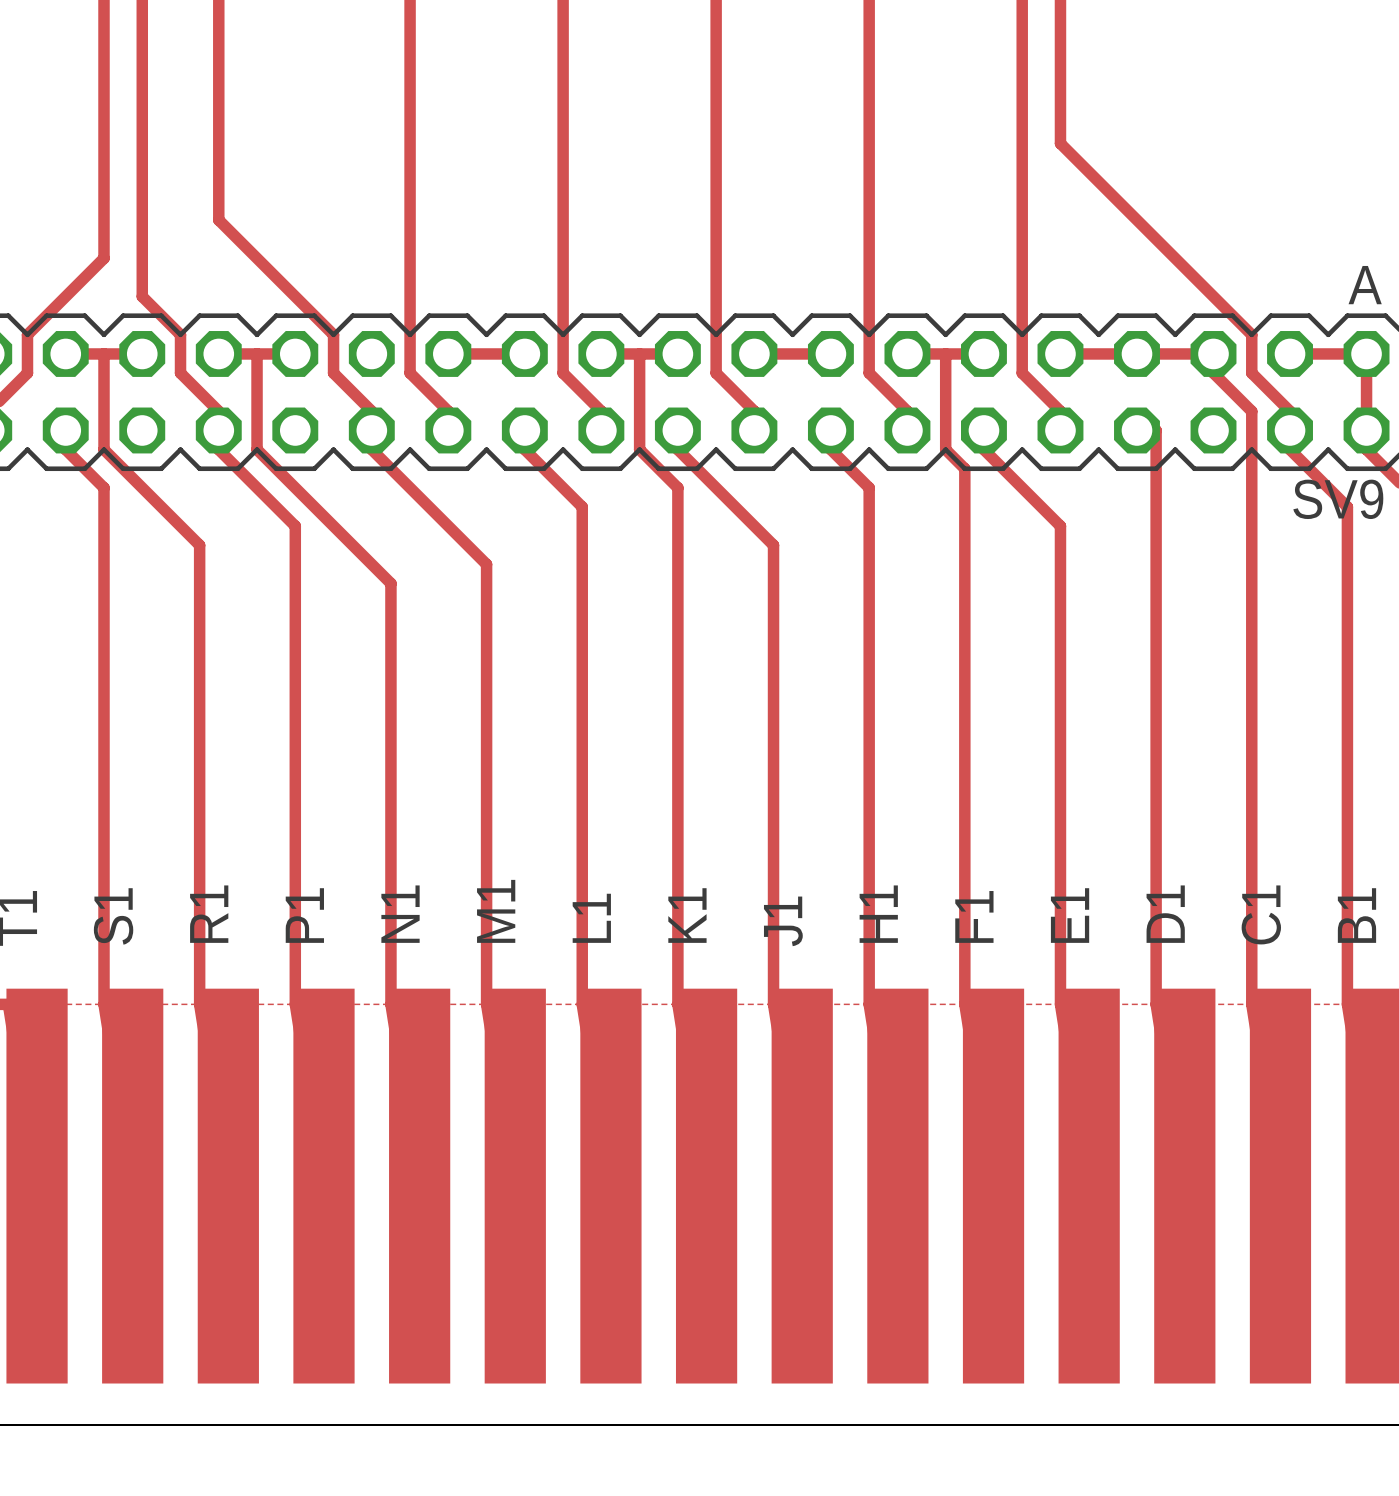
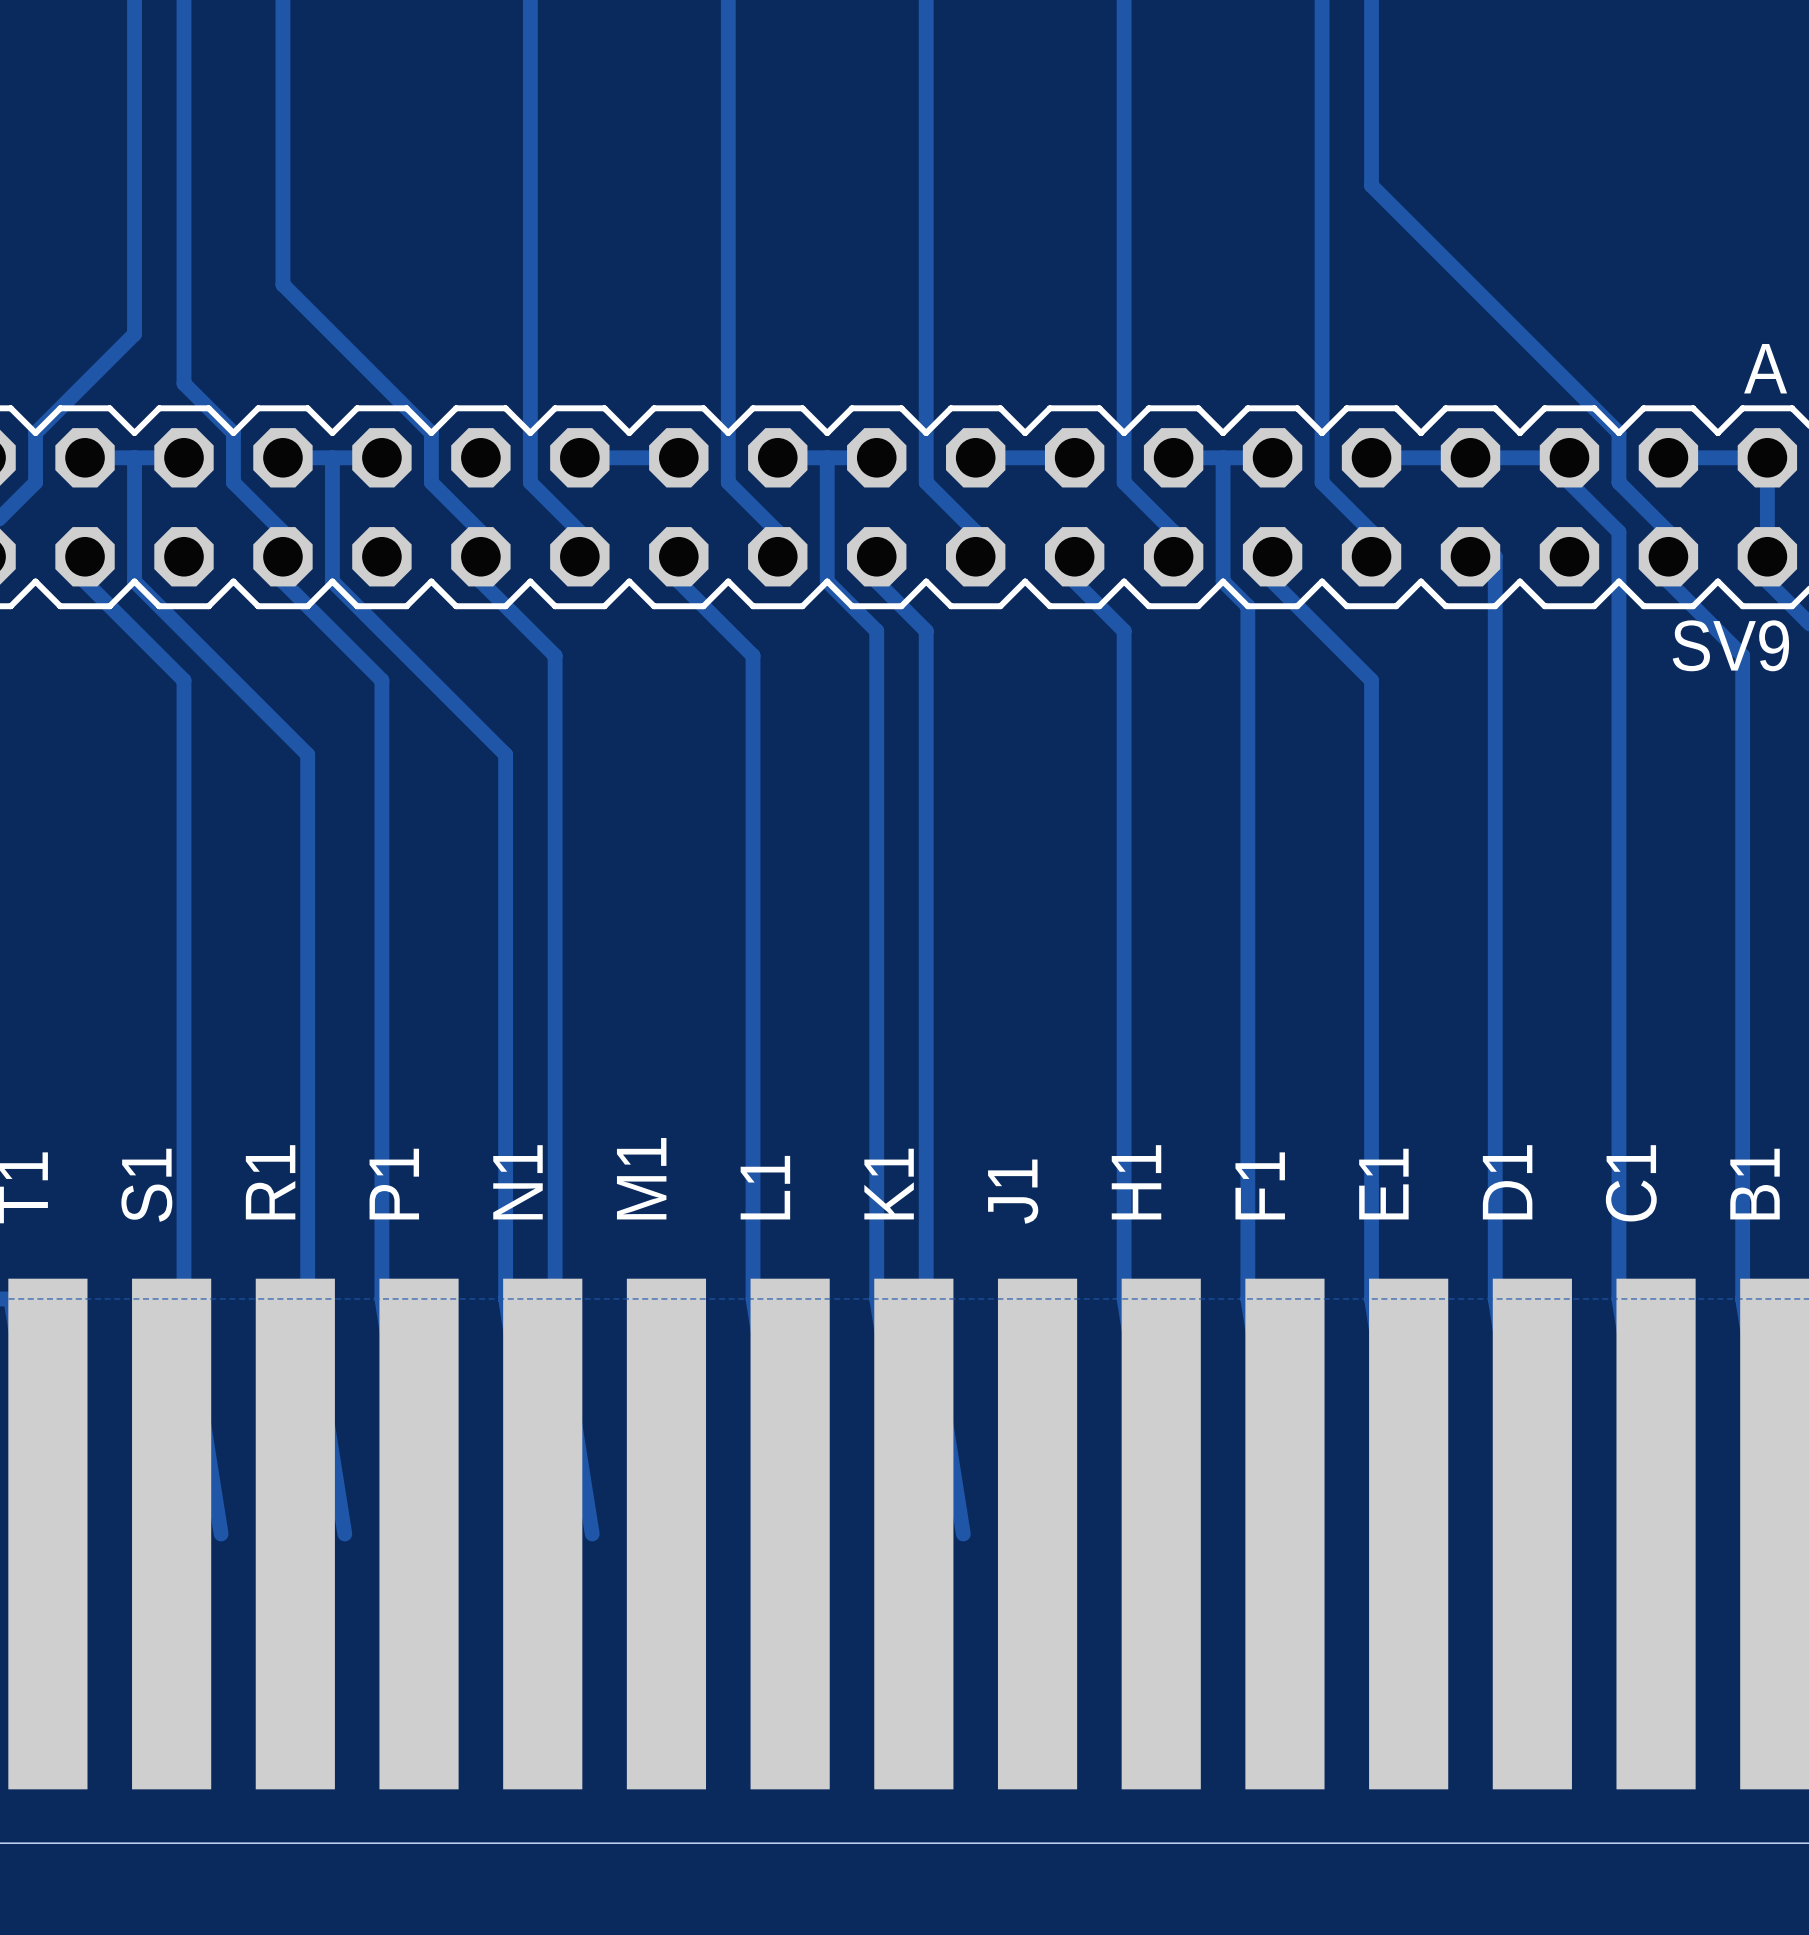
track: (104, 487) (104, 1004) (132, 1186) -> (134, 630) (183, 680) (183, 1298) (221, 1534)
track: (716, 487) (773, 545) (773, 1004) (802, 1186) -> (926, 630) (926, 1298) (963, 1534)
track: (429, 507) (486, 564) (486, 1004) (515, 1186) -> (555, 655) (555, 1298) (592, 1534)
track: (199, 545) (199, 1004) (228, 1186) -> (258, 705) (307, 754) (307, 1298) (344, 1534)

